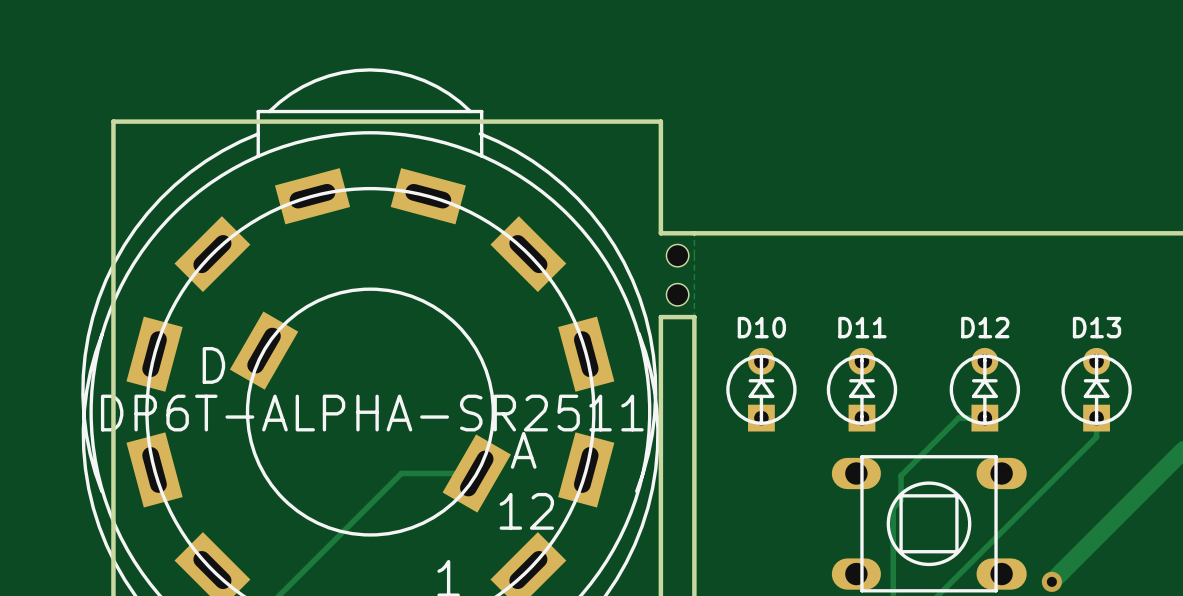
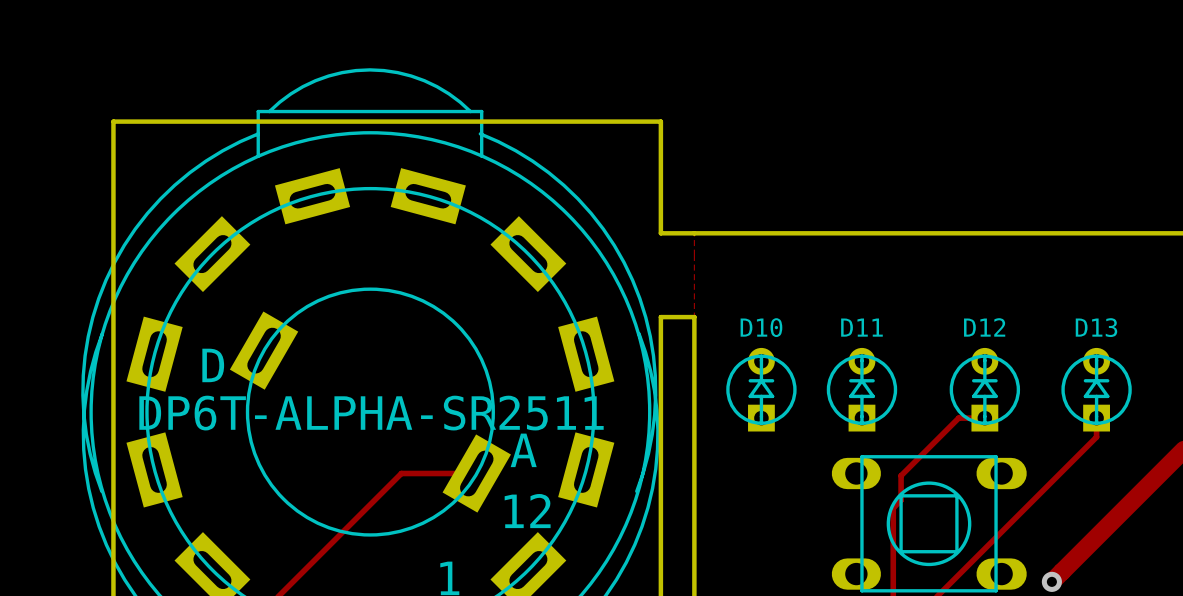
part: (677, 255) -> none
part: (677, 294) -> none

